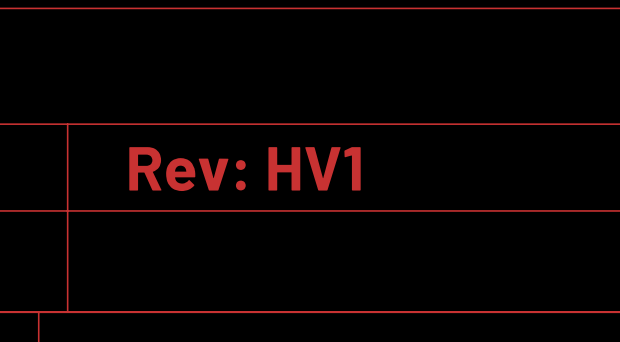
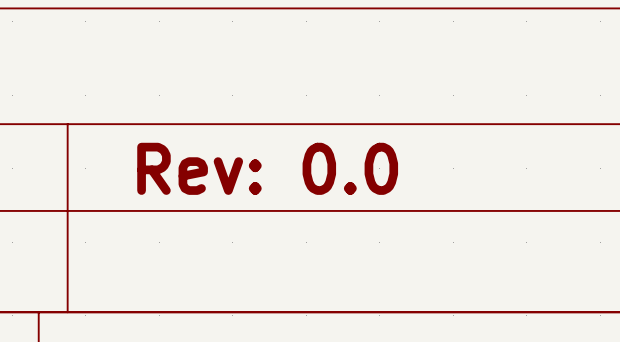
title block: Rev: HV1 (244, 169) -> Rev: 0.0 (267, 168)

